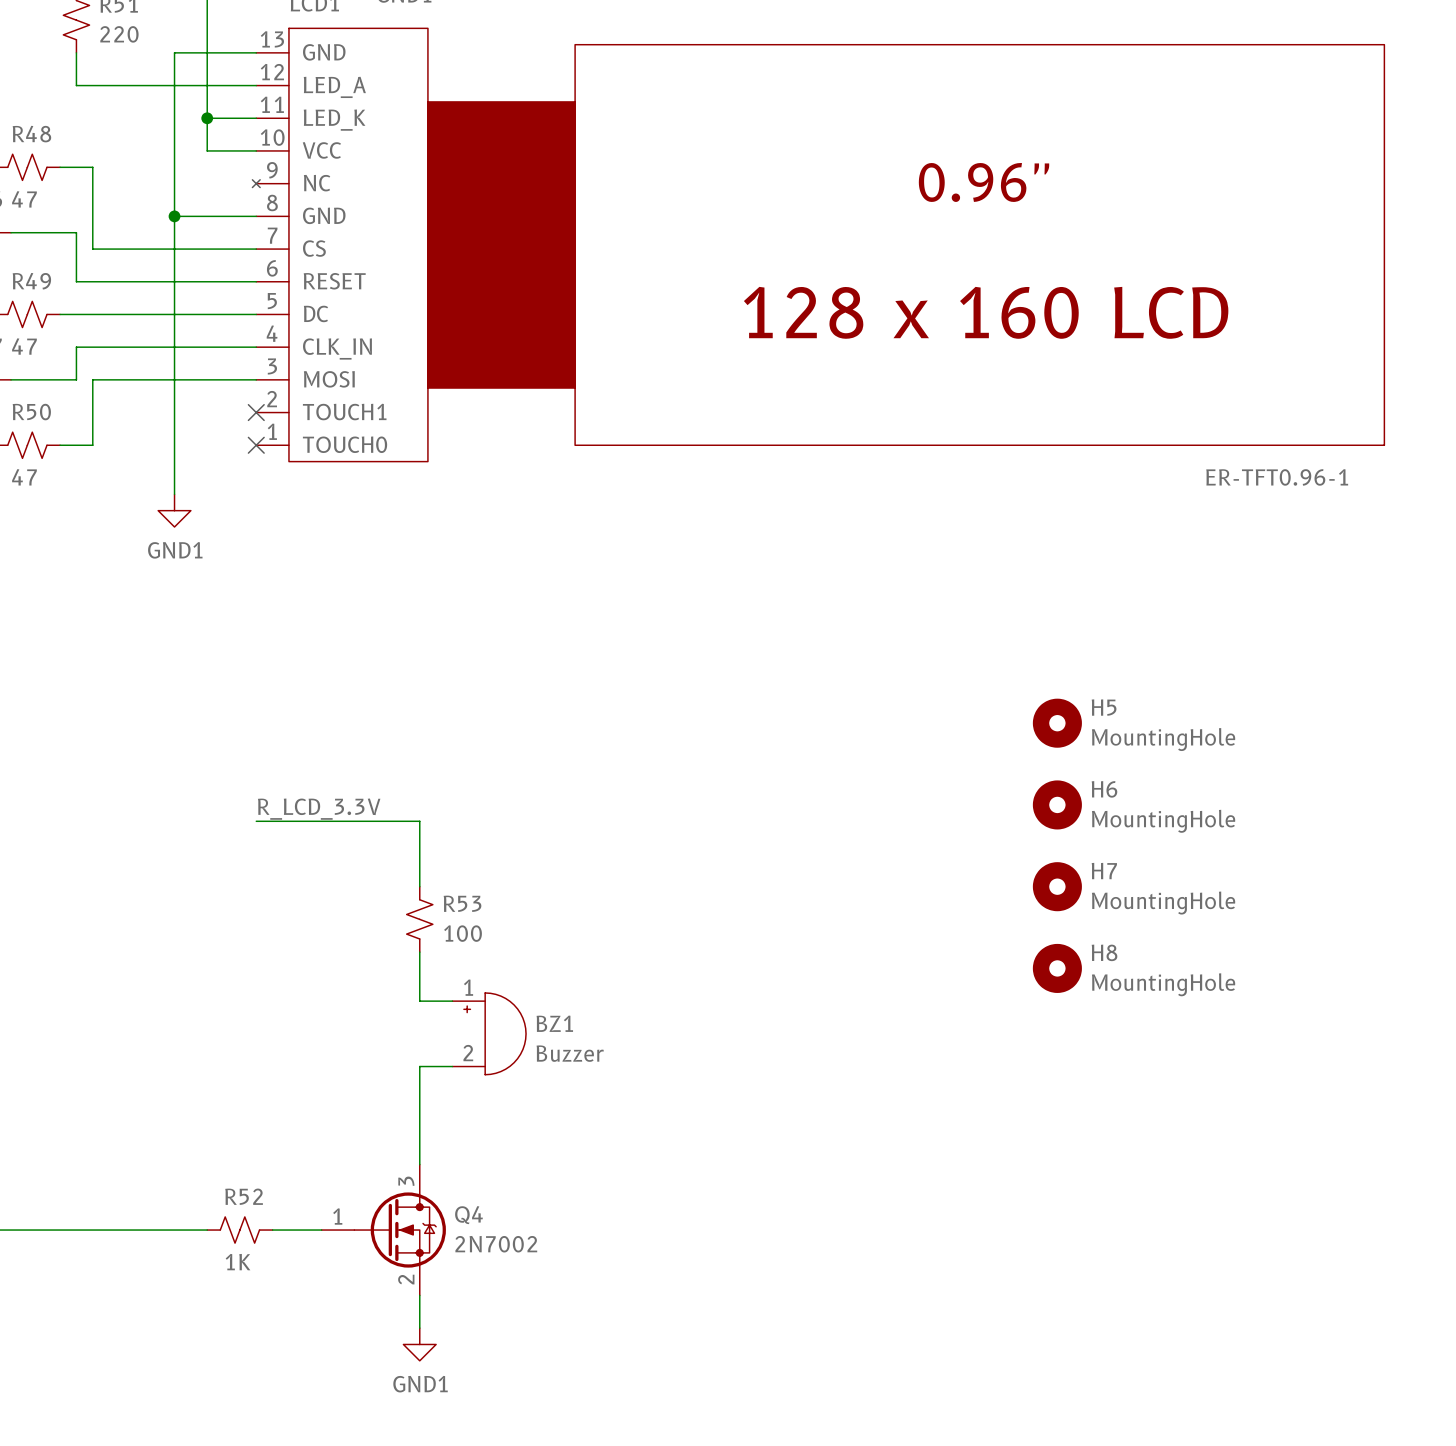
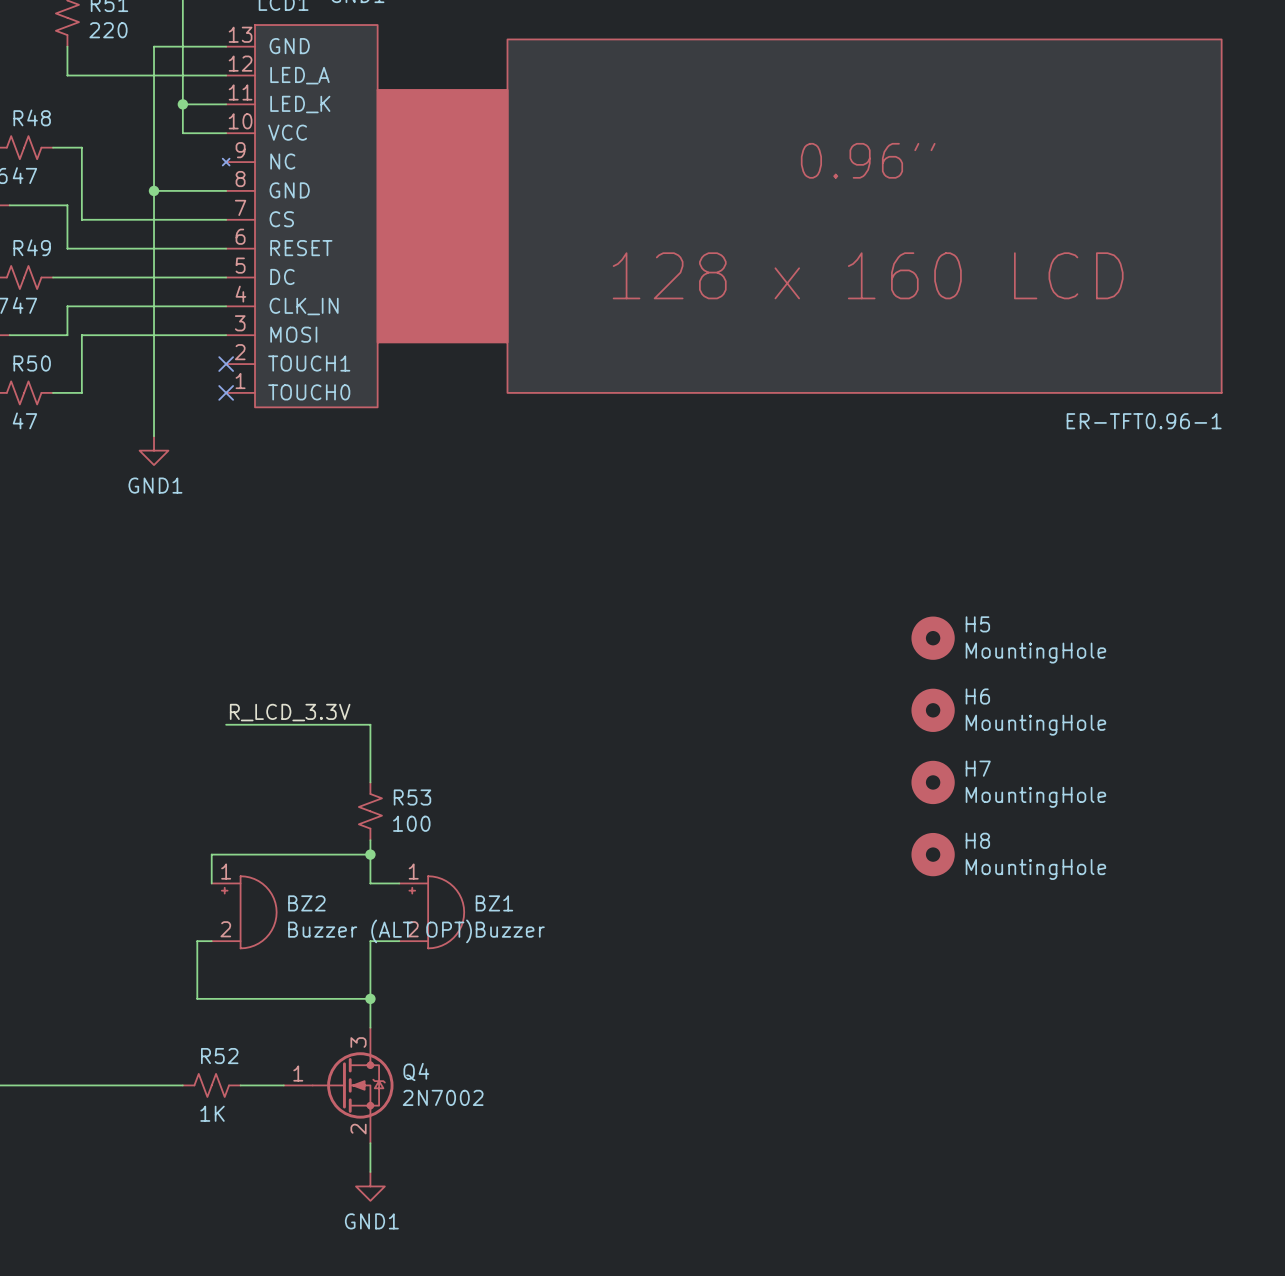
wire: none -> (370, 854) (211, 854) (211, 883)
junction: none -> (370, 854)
BZ2: none -> Buzzer (ALT OPT) (244, 912)
wire: none -> (211, 941) (197, 941) (197, 998) (370, 998)
junction: none -> (370, 998)

